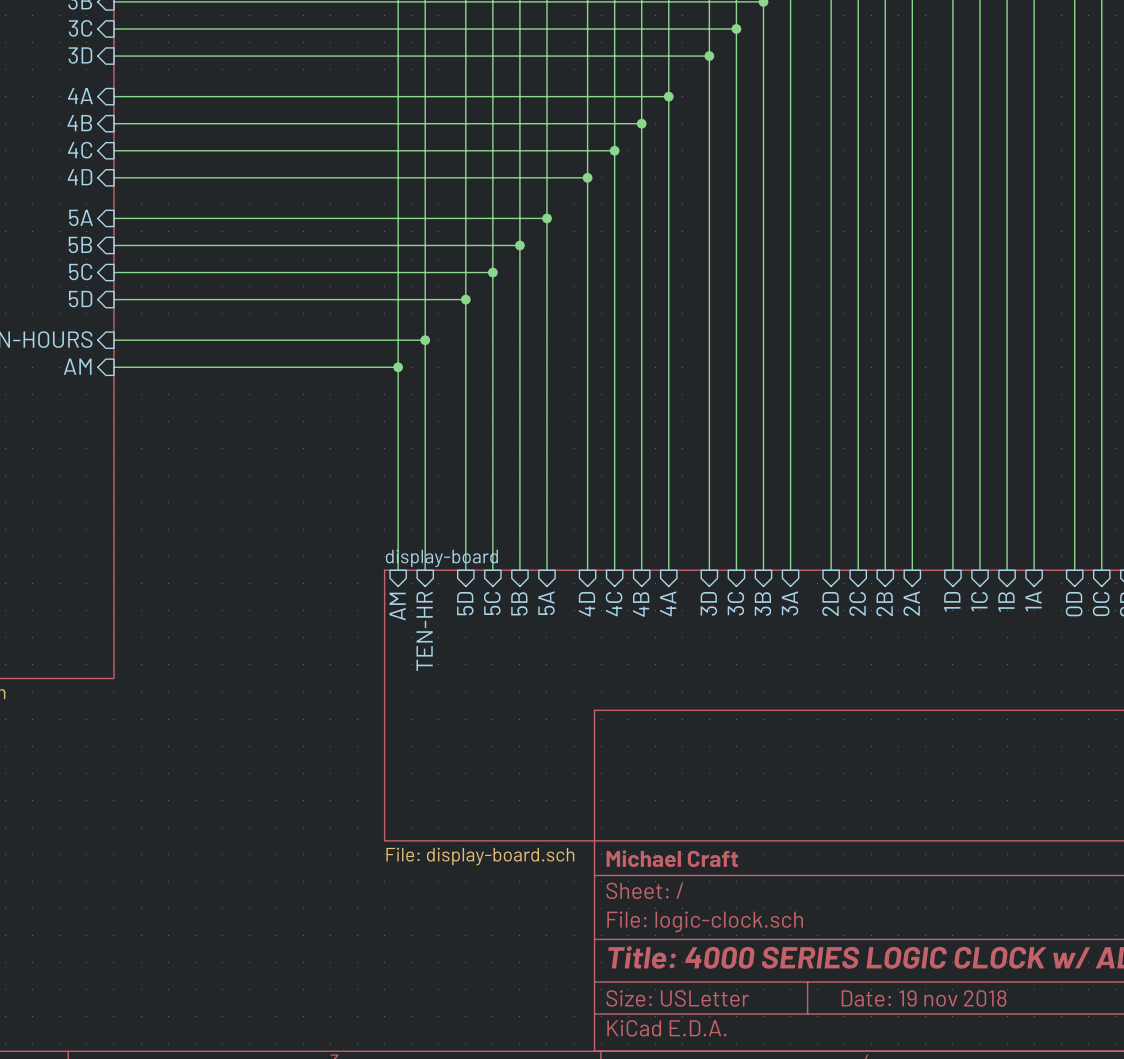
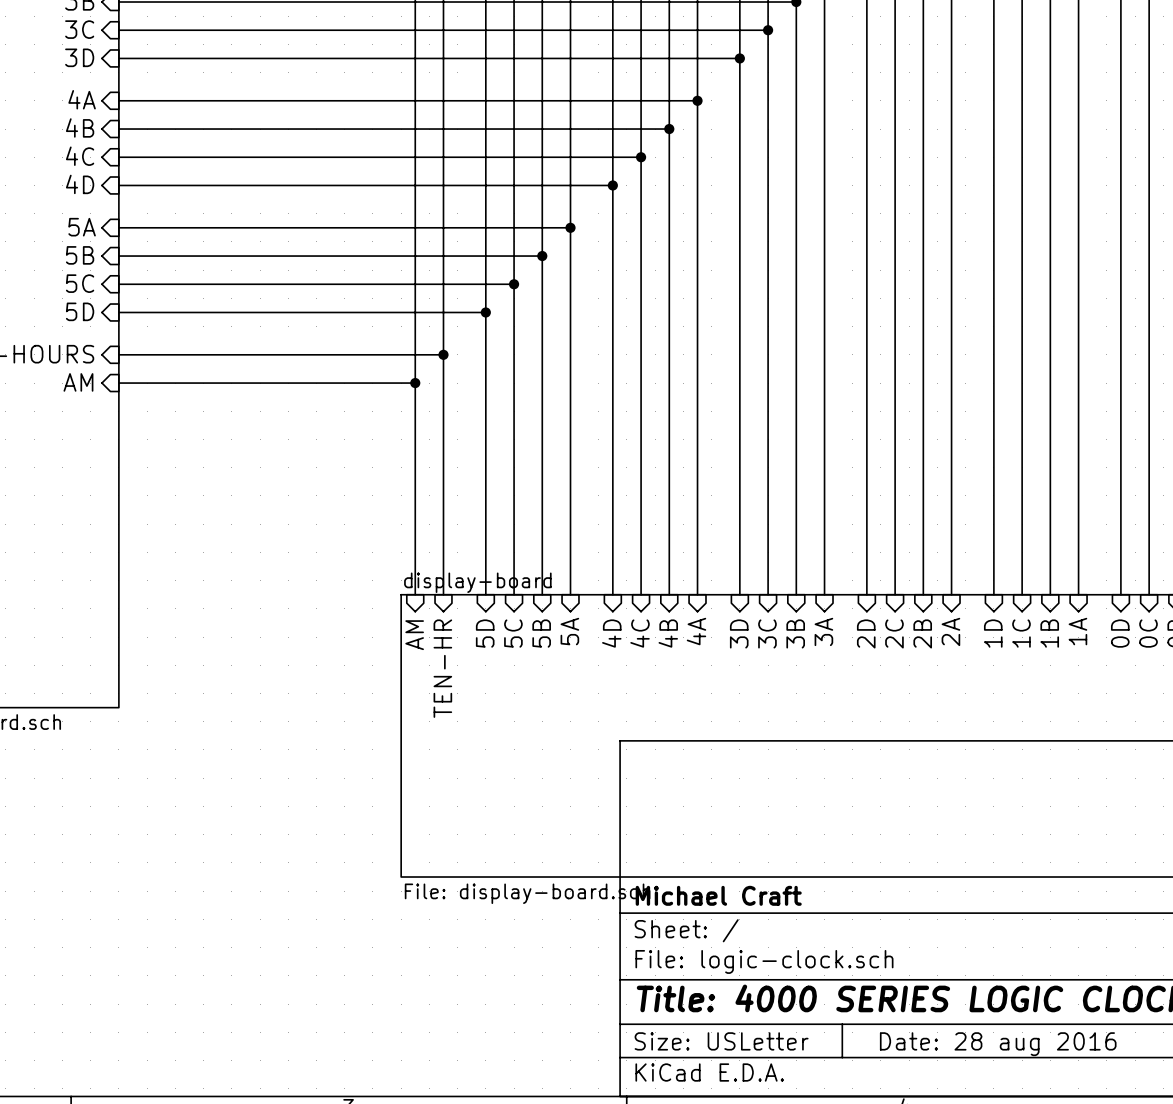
title block: Date: 19 nov 2018 (924, 998) -> Date: 28 aug 2016 (998, 1044)

